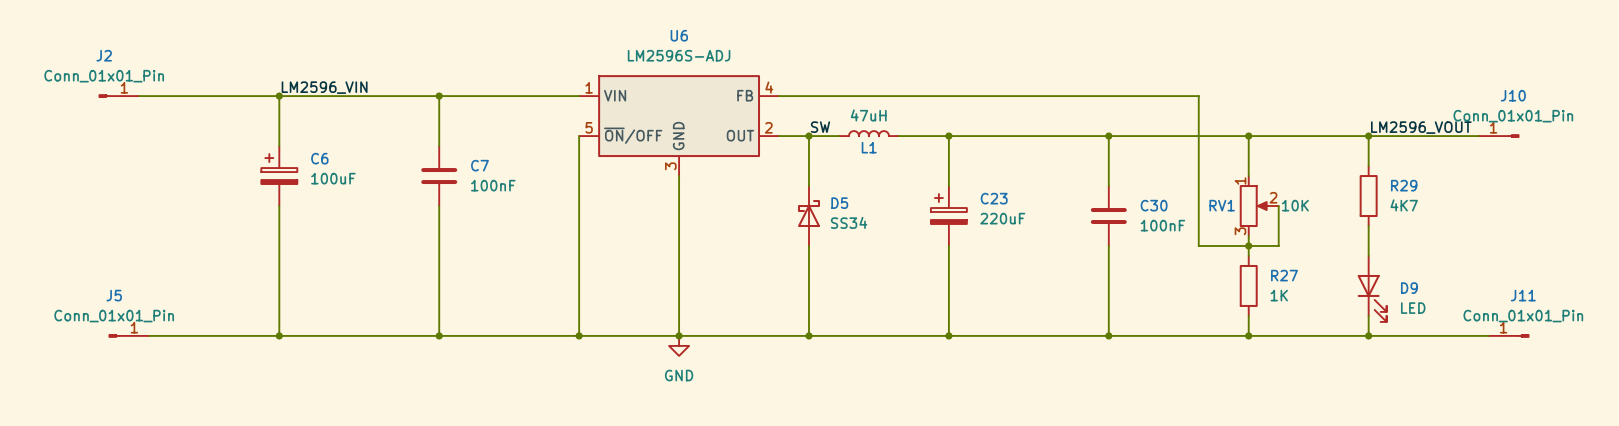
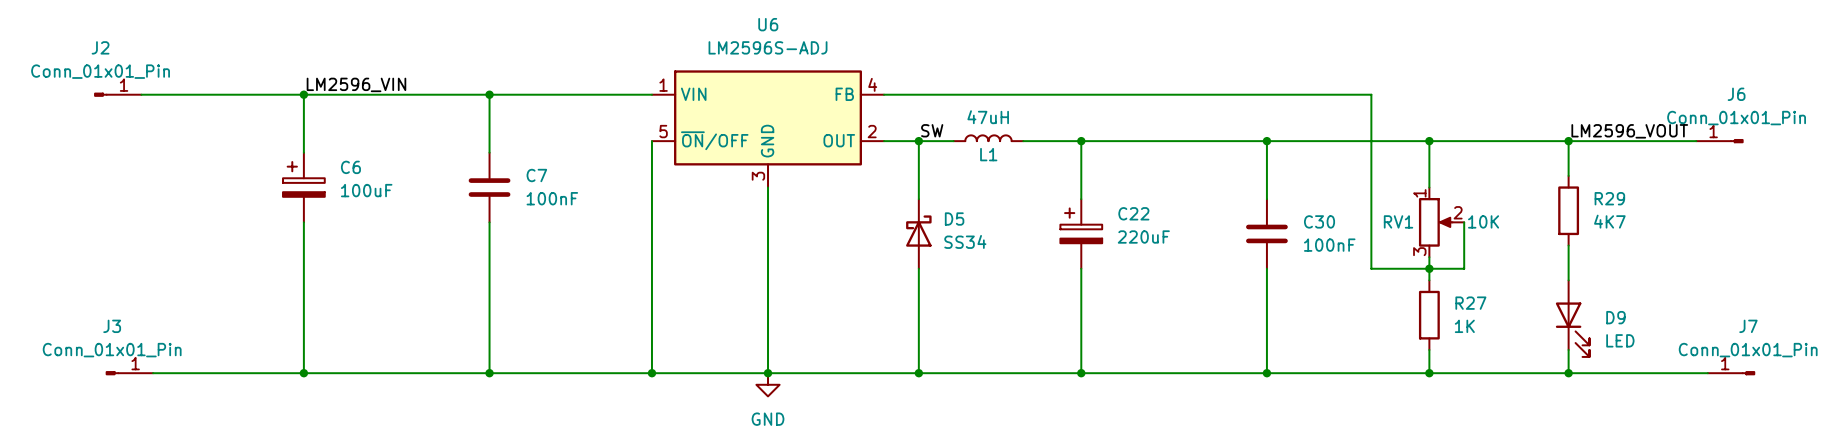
J10 name: J10 (1513, 95) -> J6 (1736, 94)
C23 name: C23 (994, 198) -> C22 (1133, 213)
J5 name: J5 (114, 295) -> J3 (112, 326)
J11 name: J11 (1523, 295) -> J7 (1748, 326)

